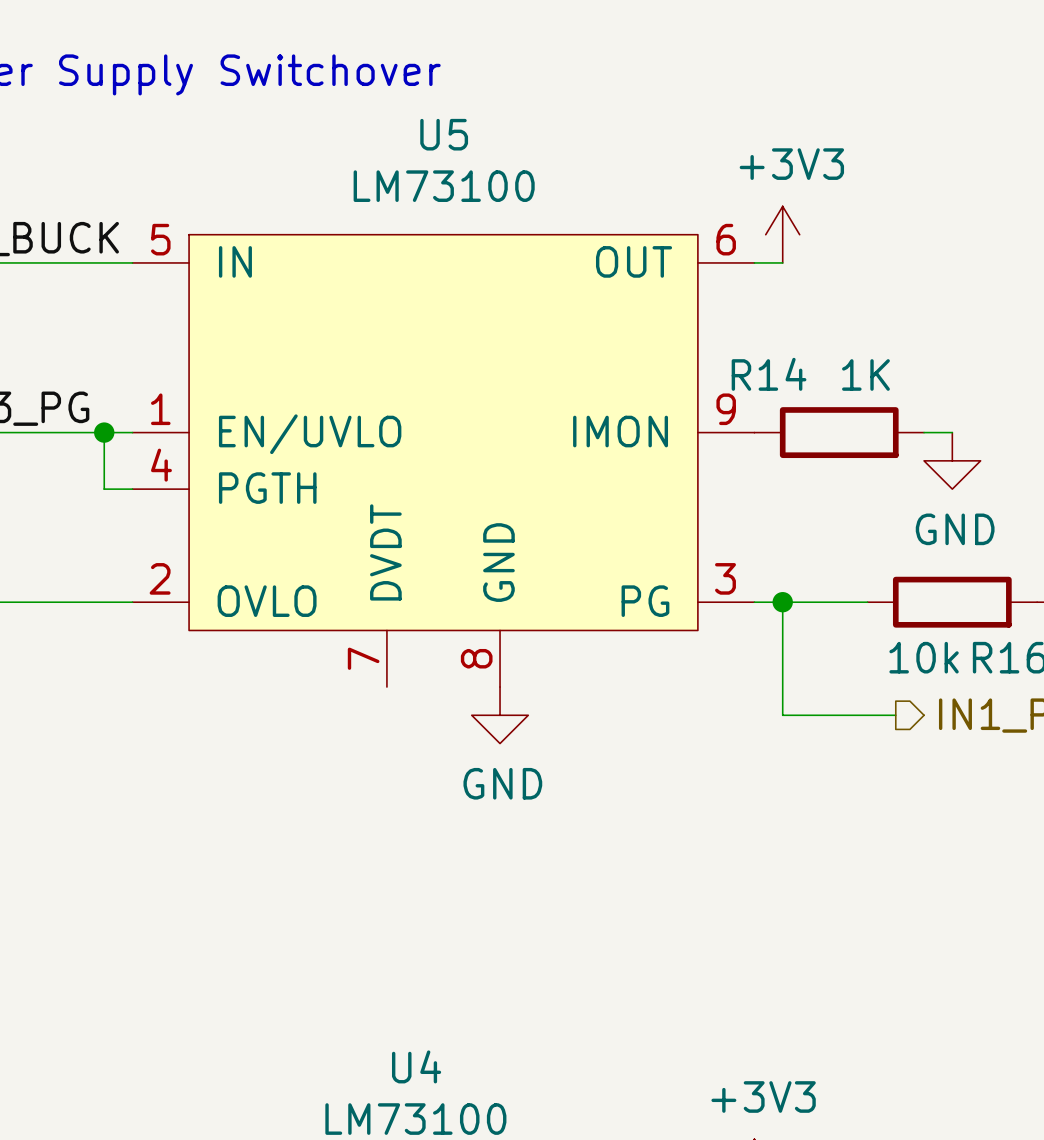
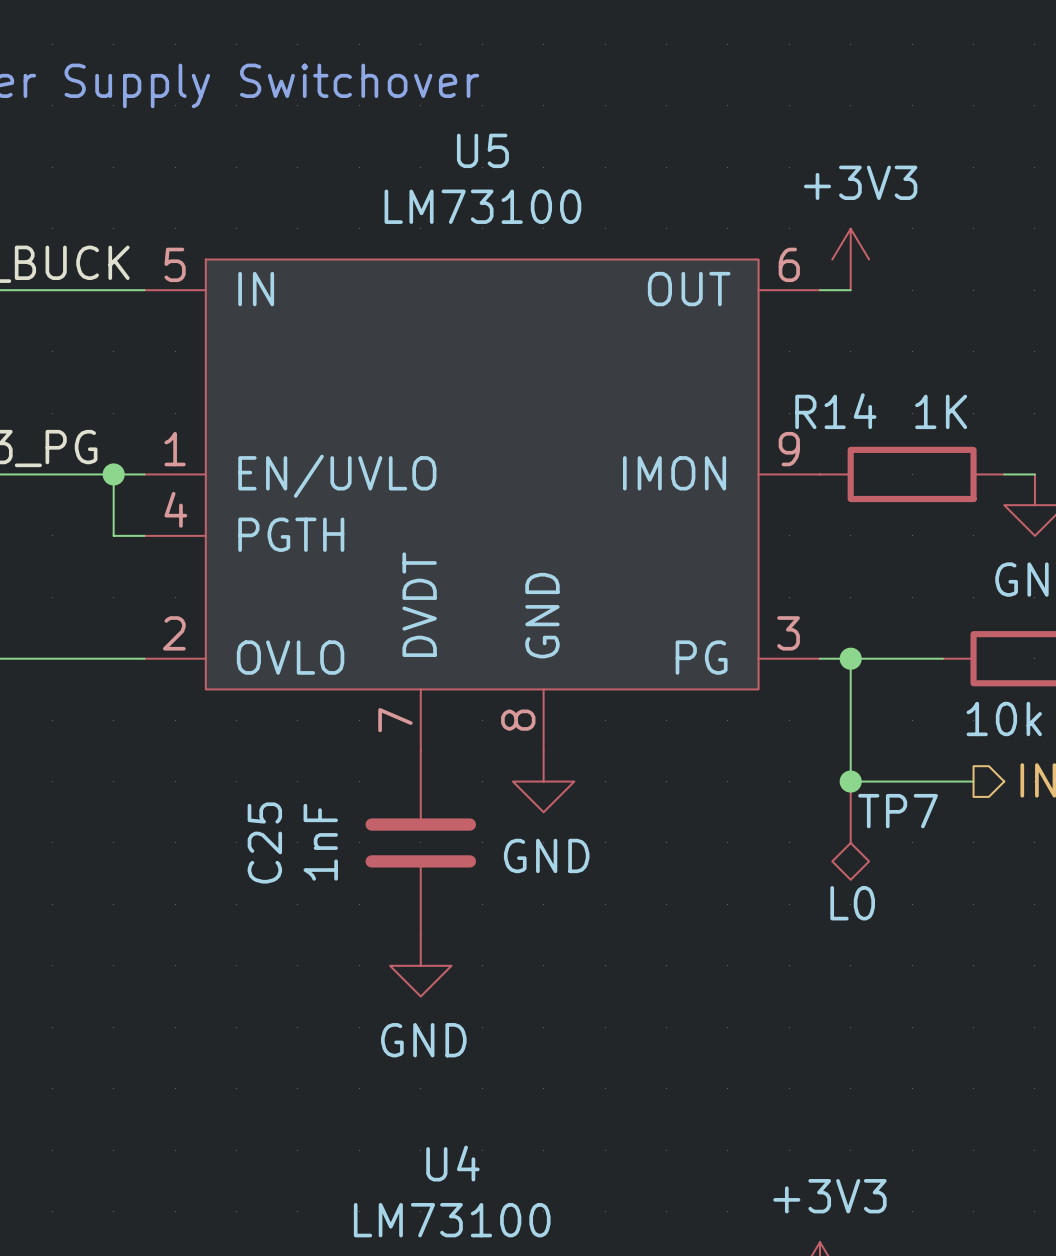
junction: none -> (850, 781)
TP7: none -> L0 (850, 830)
C25: none -> 1nF (420, 842)
power symbol: none -> GND (420, 965)

